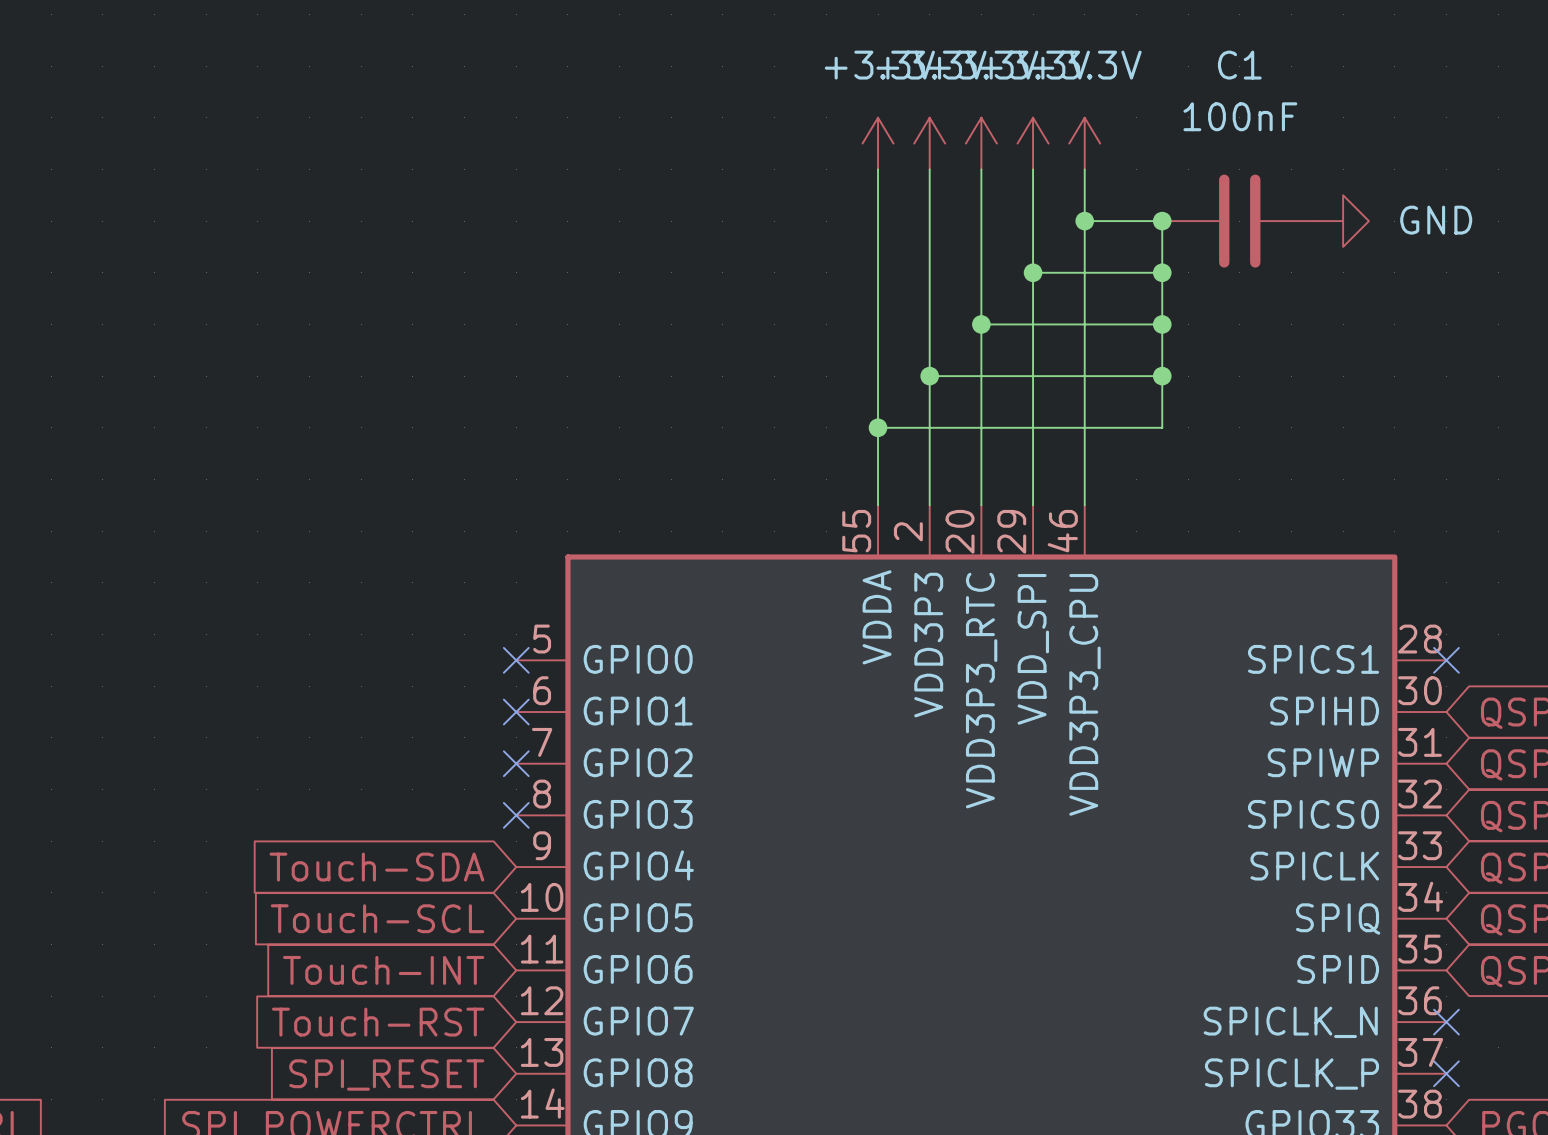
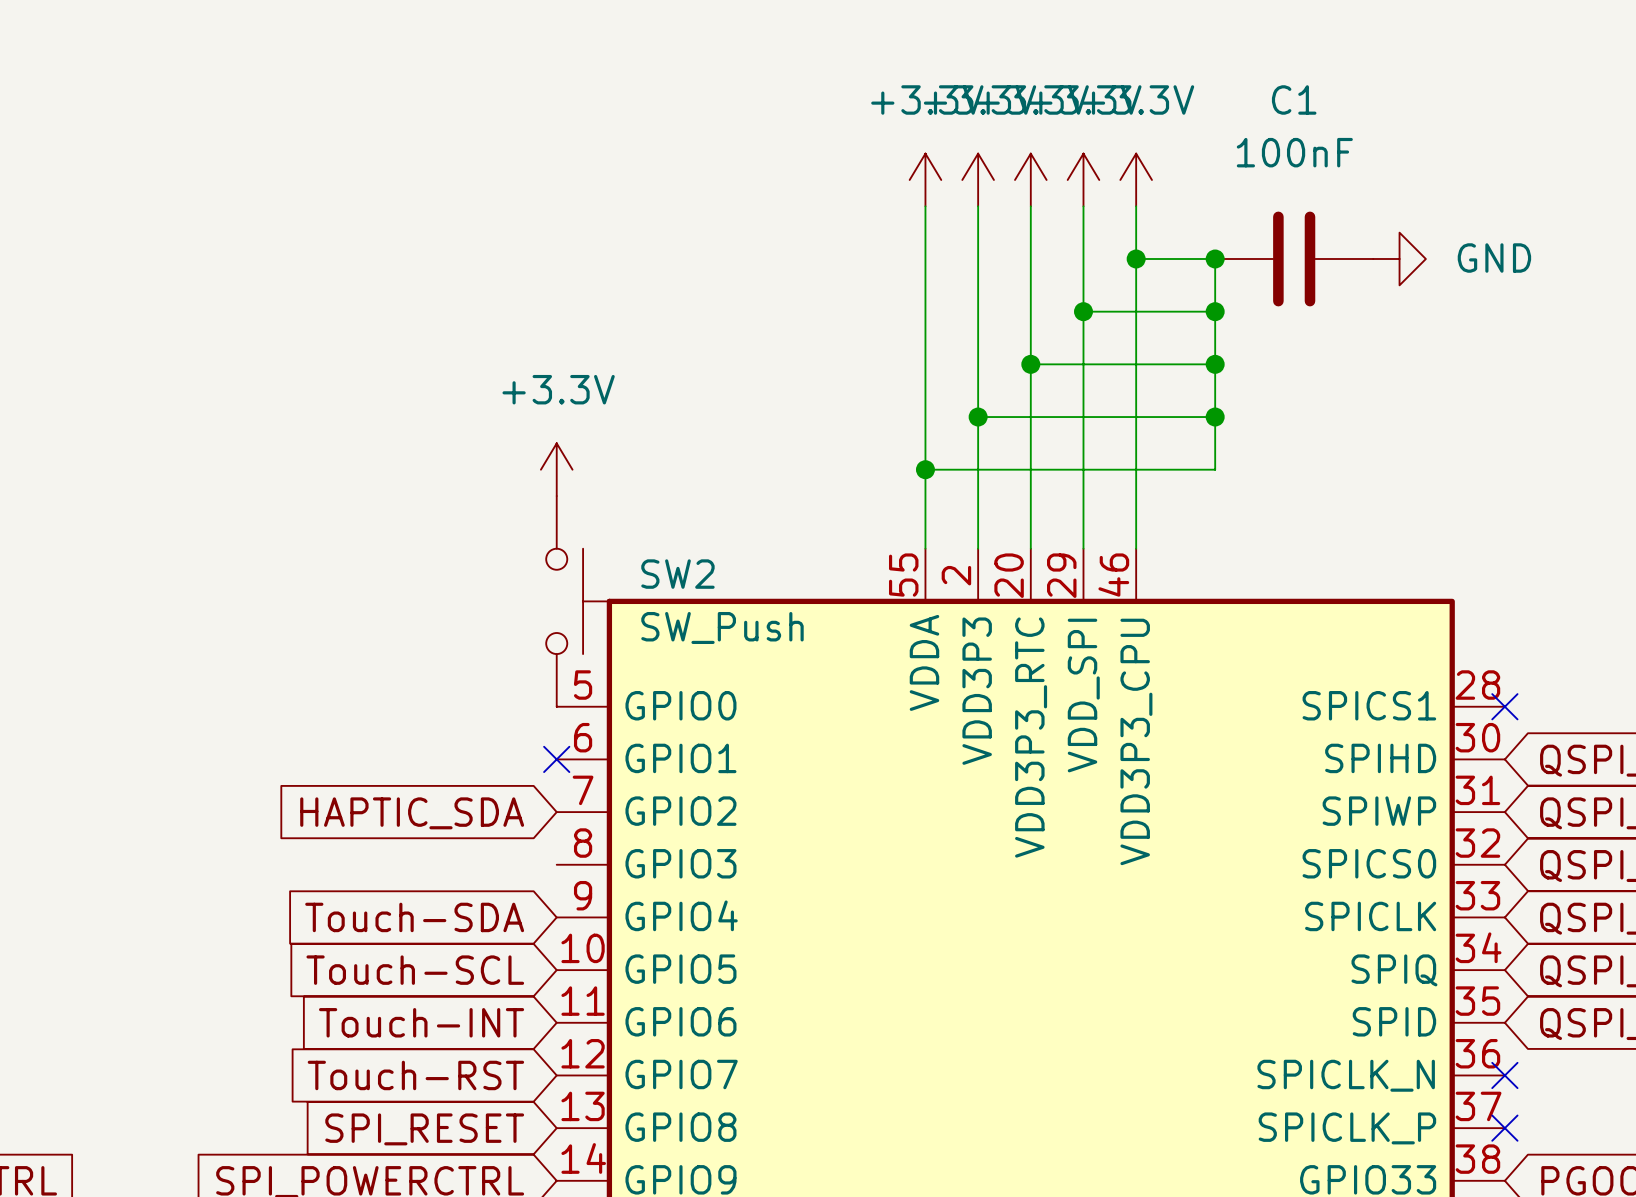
power symbol: none -> +3.3V (556, 469)
SW2: none -> SW_Push (583, 601)
no-connect mark: (516, 660) -> none
no-connect mark: (516, 763) -> none
global label: none -> HAPTIC_SDA (412, 813)
no-connect mark: (516, 815) -> none

